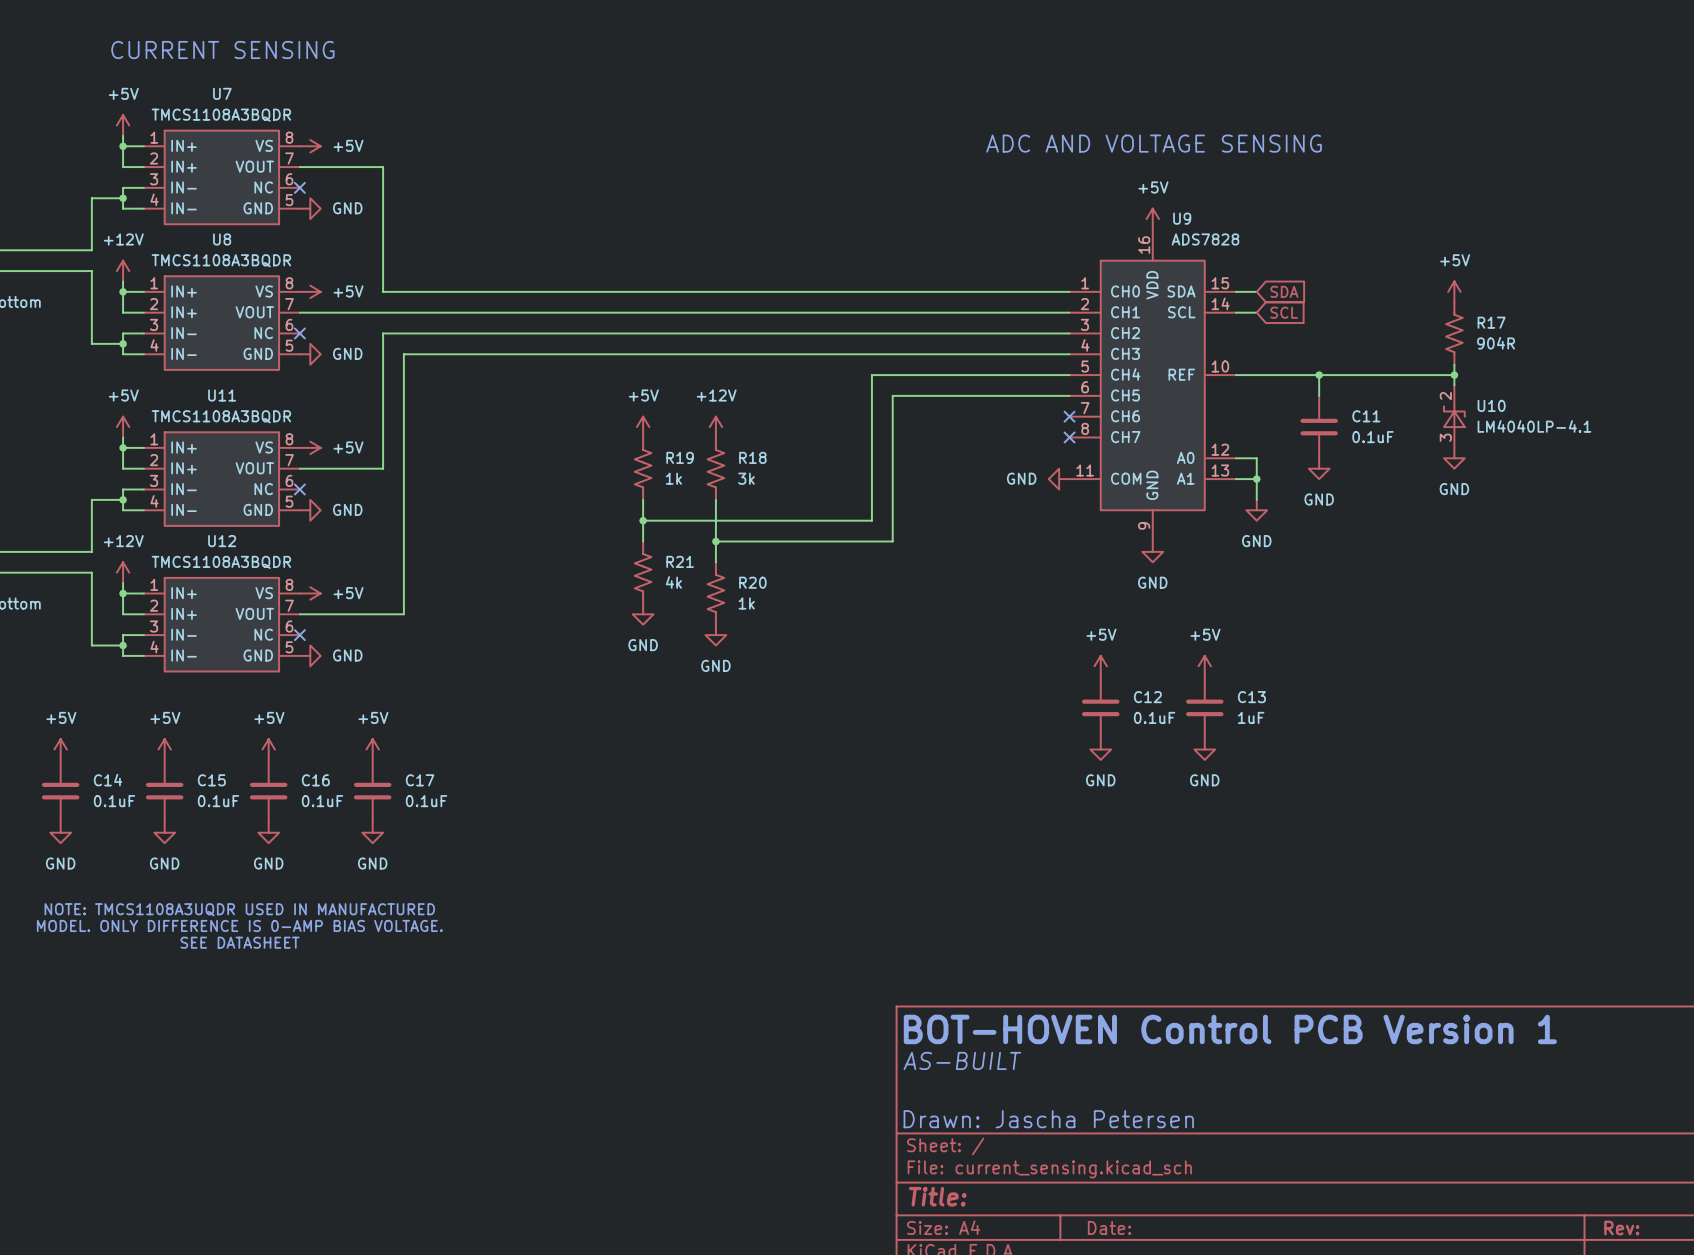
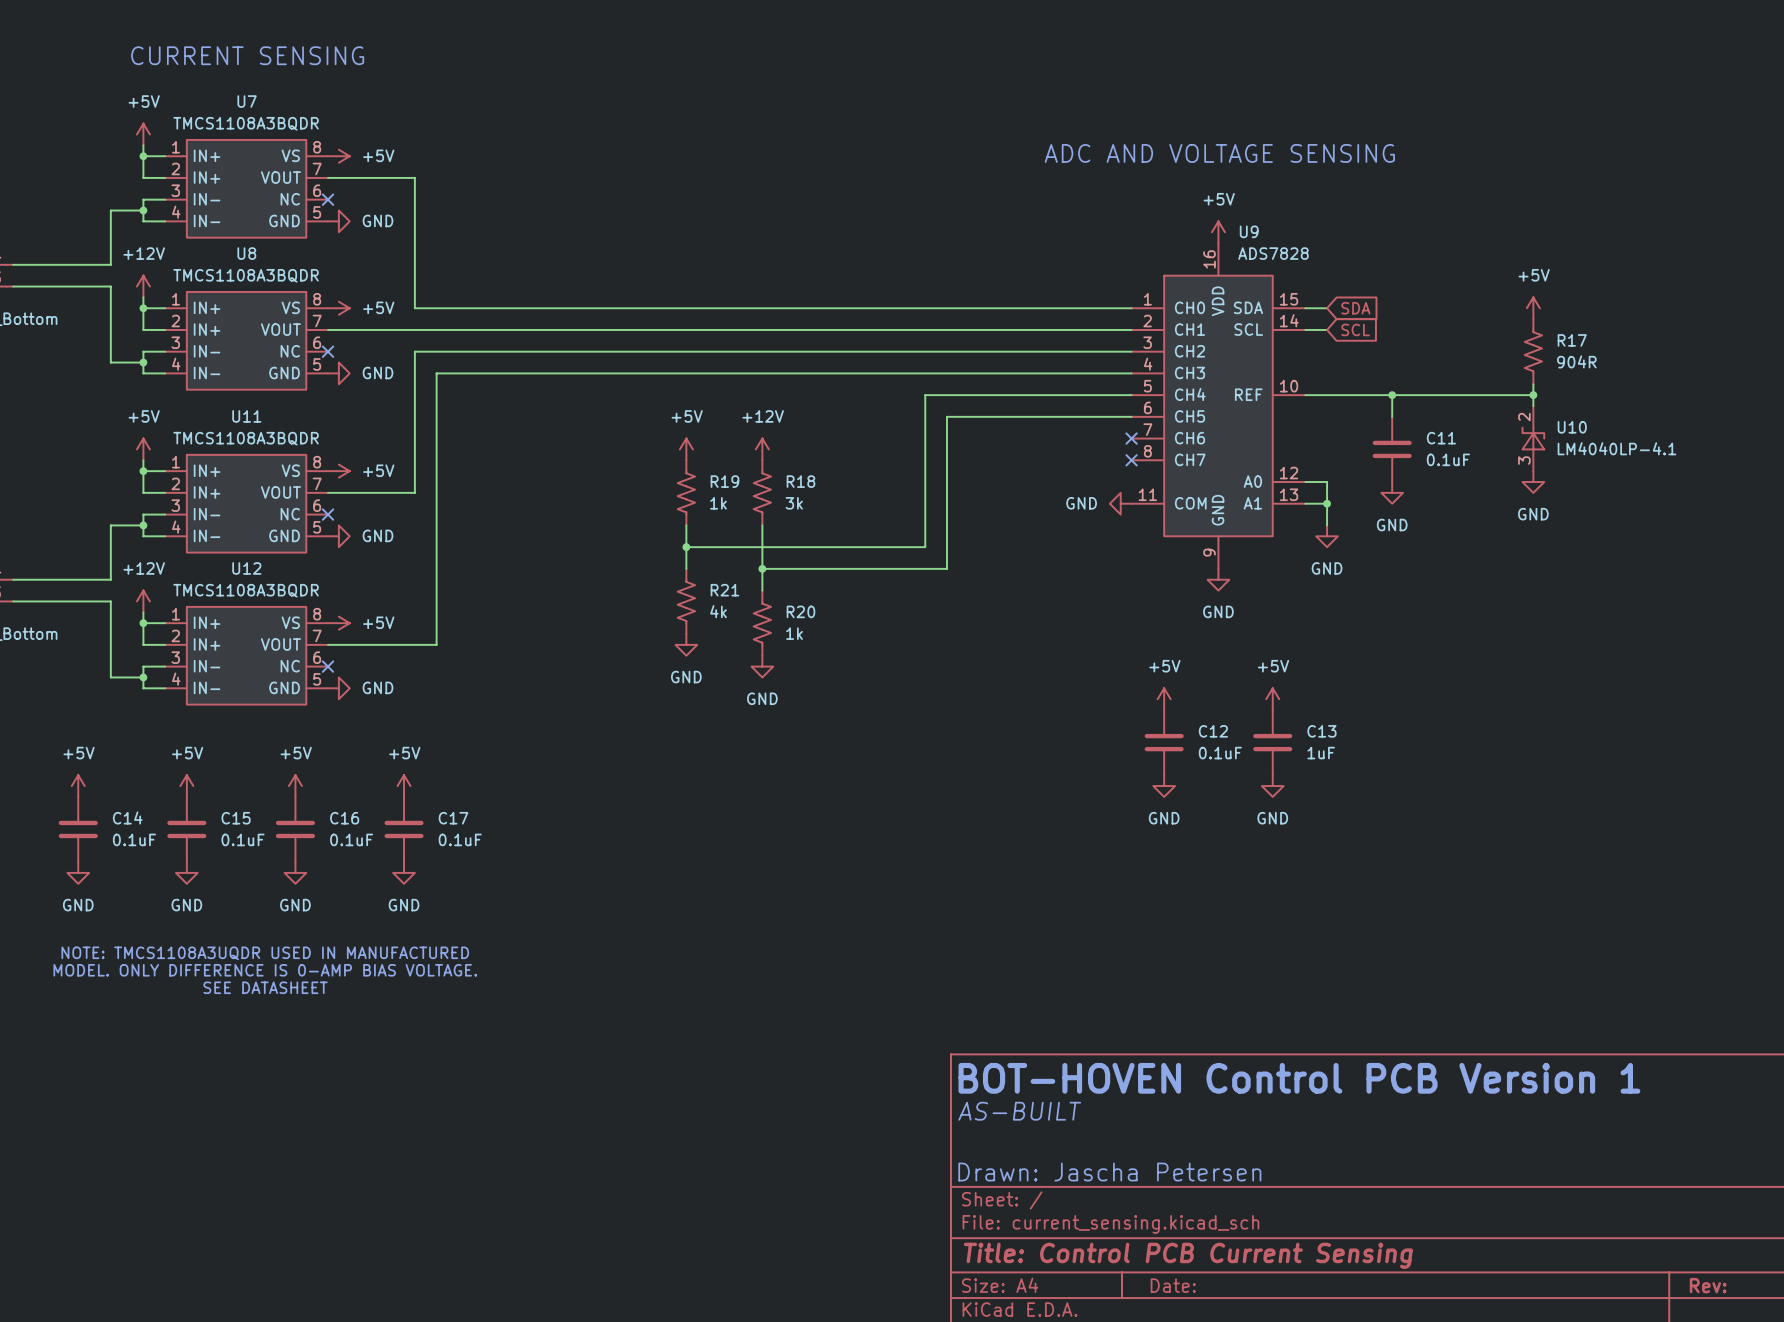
title block: Title: (937, 1196) -> Title: Control PCB Current Sensing (1188, 1255)

